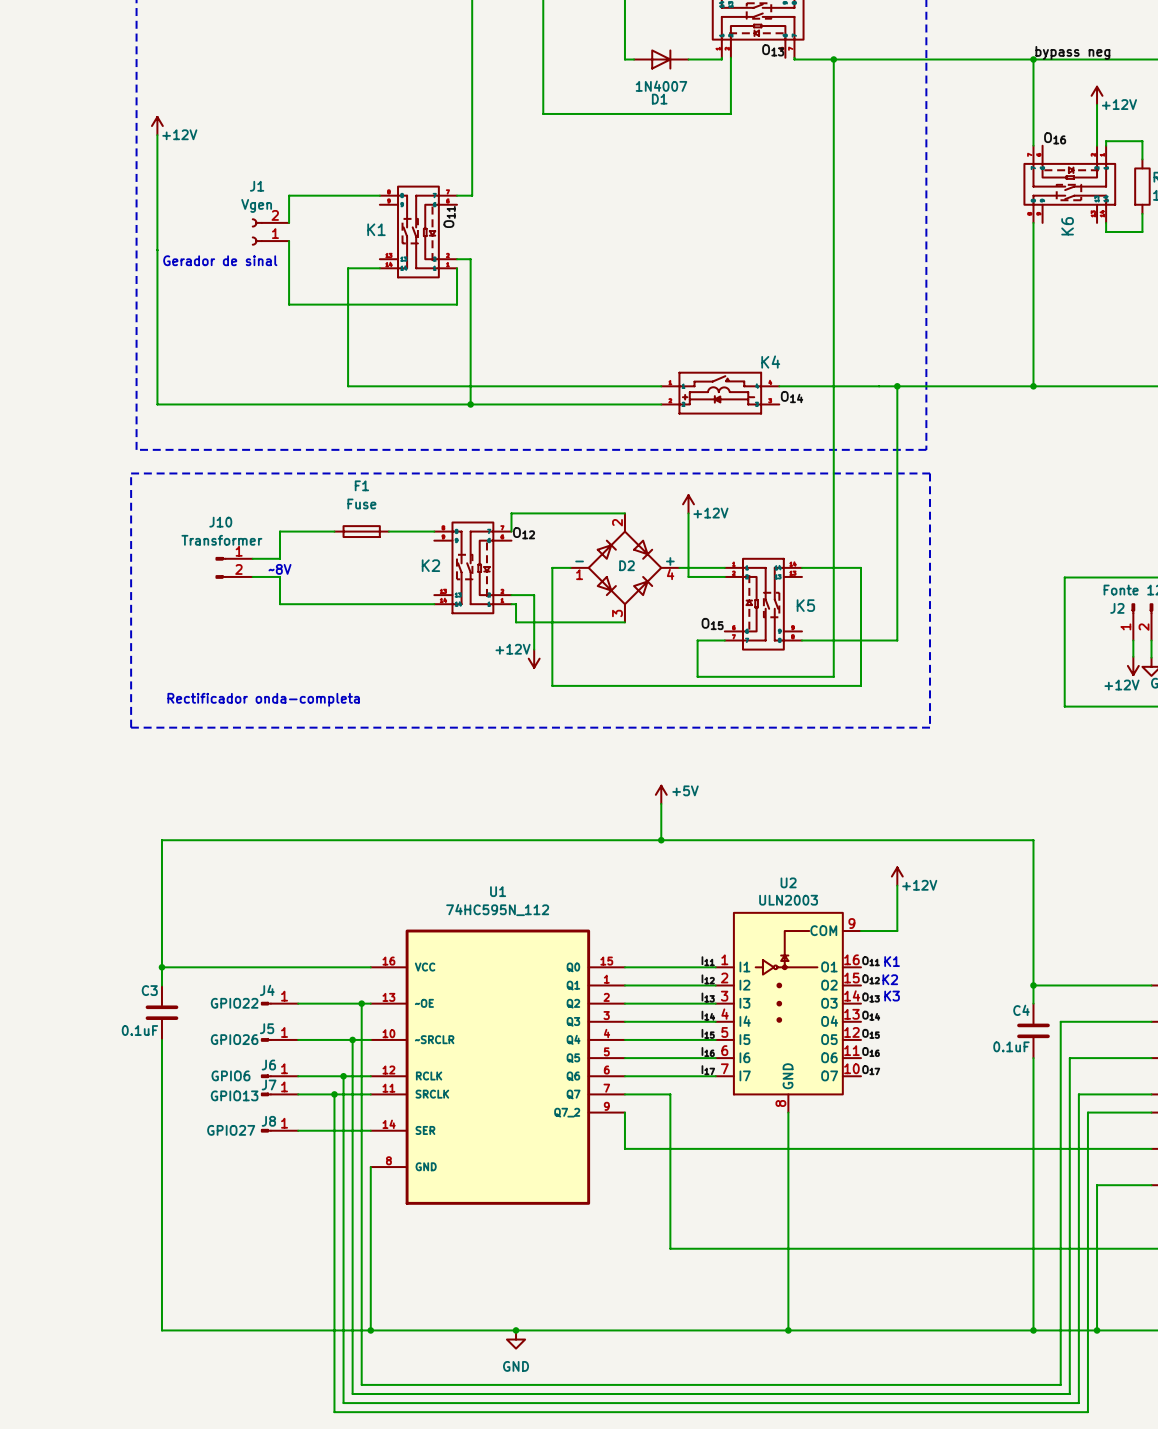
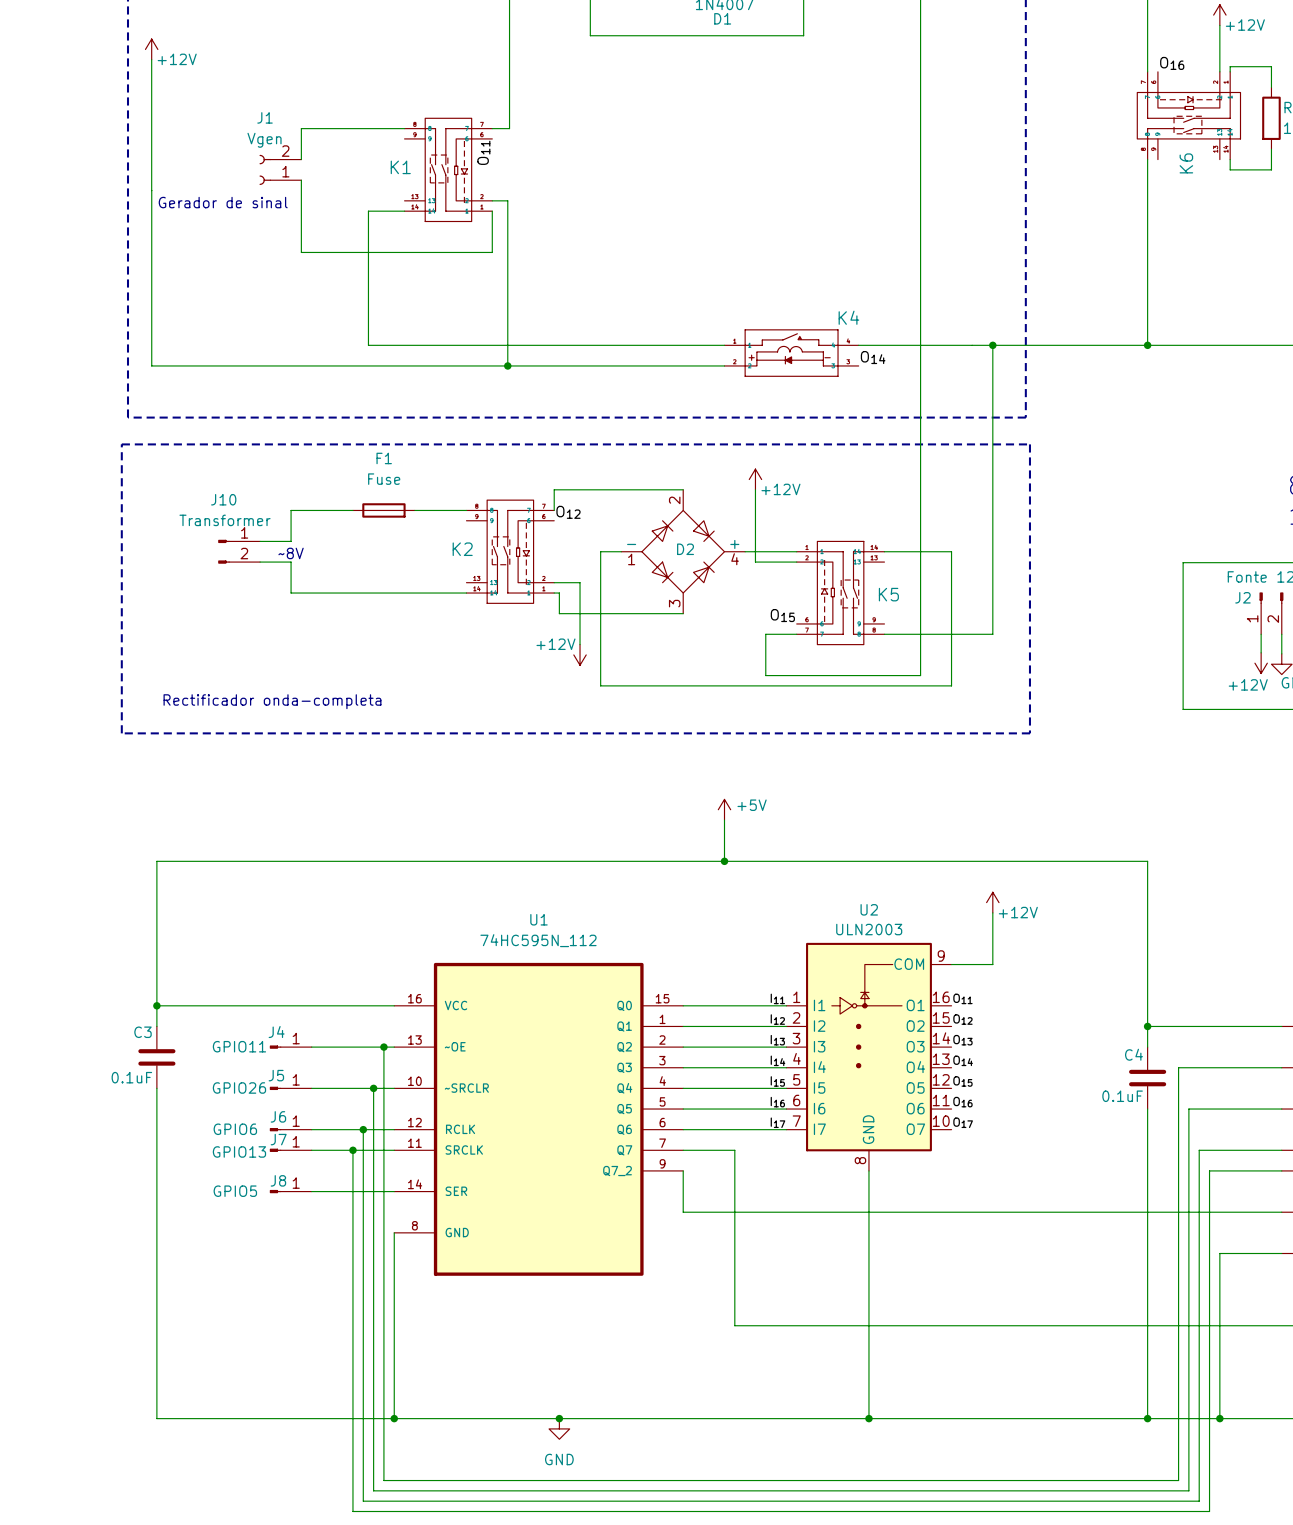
text: K1 (892, 961) -> none
text: K2 (890, 979) -> none
text: K3 (892, 996) -> none
J4 value: GPIO22 (234, 1003) -> GPIO11 (239, 1046)
J8 value: GPIO27 (231, 1130) -> GPIO5 (235, 1191)

